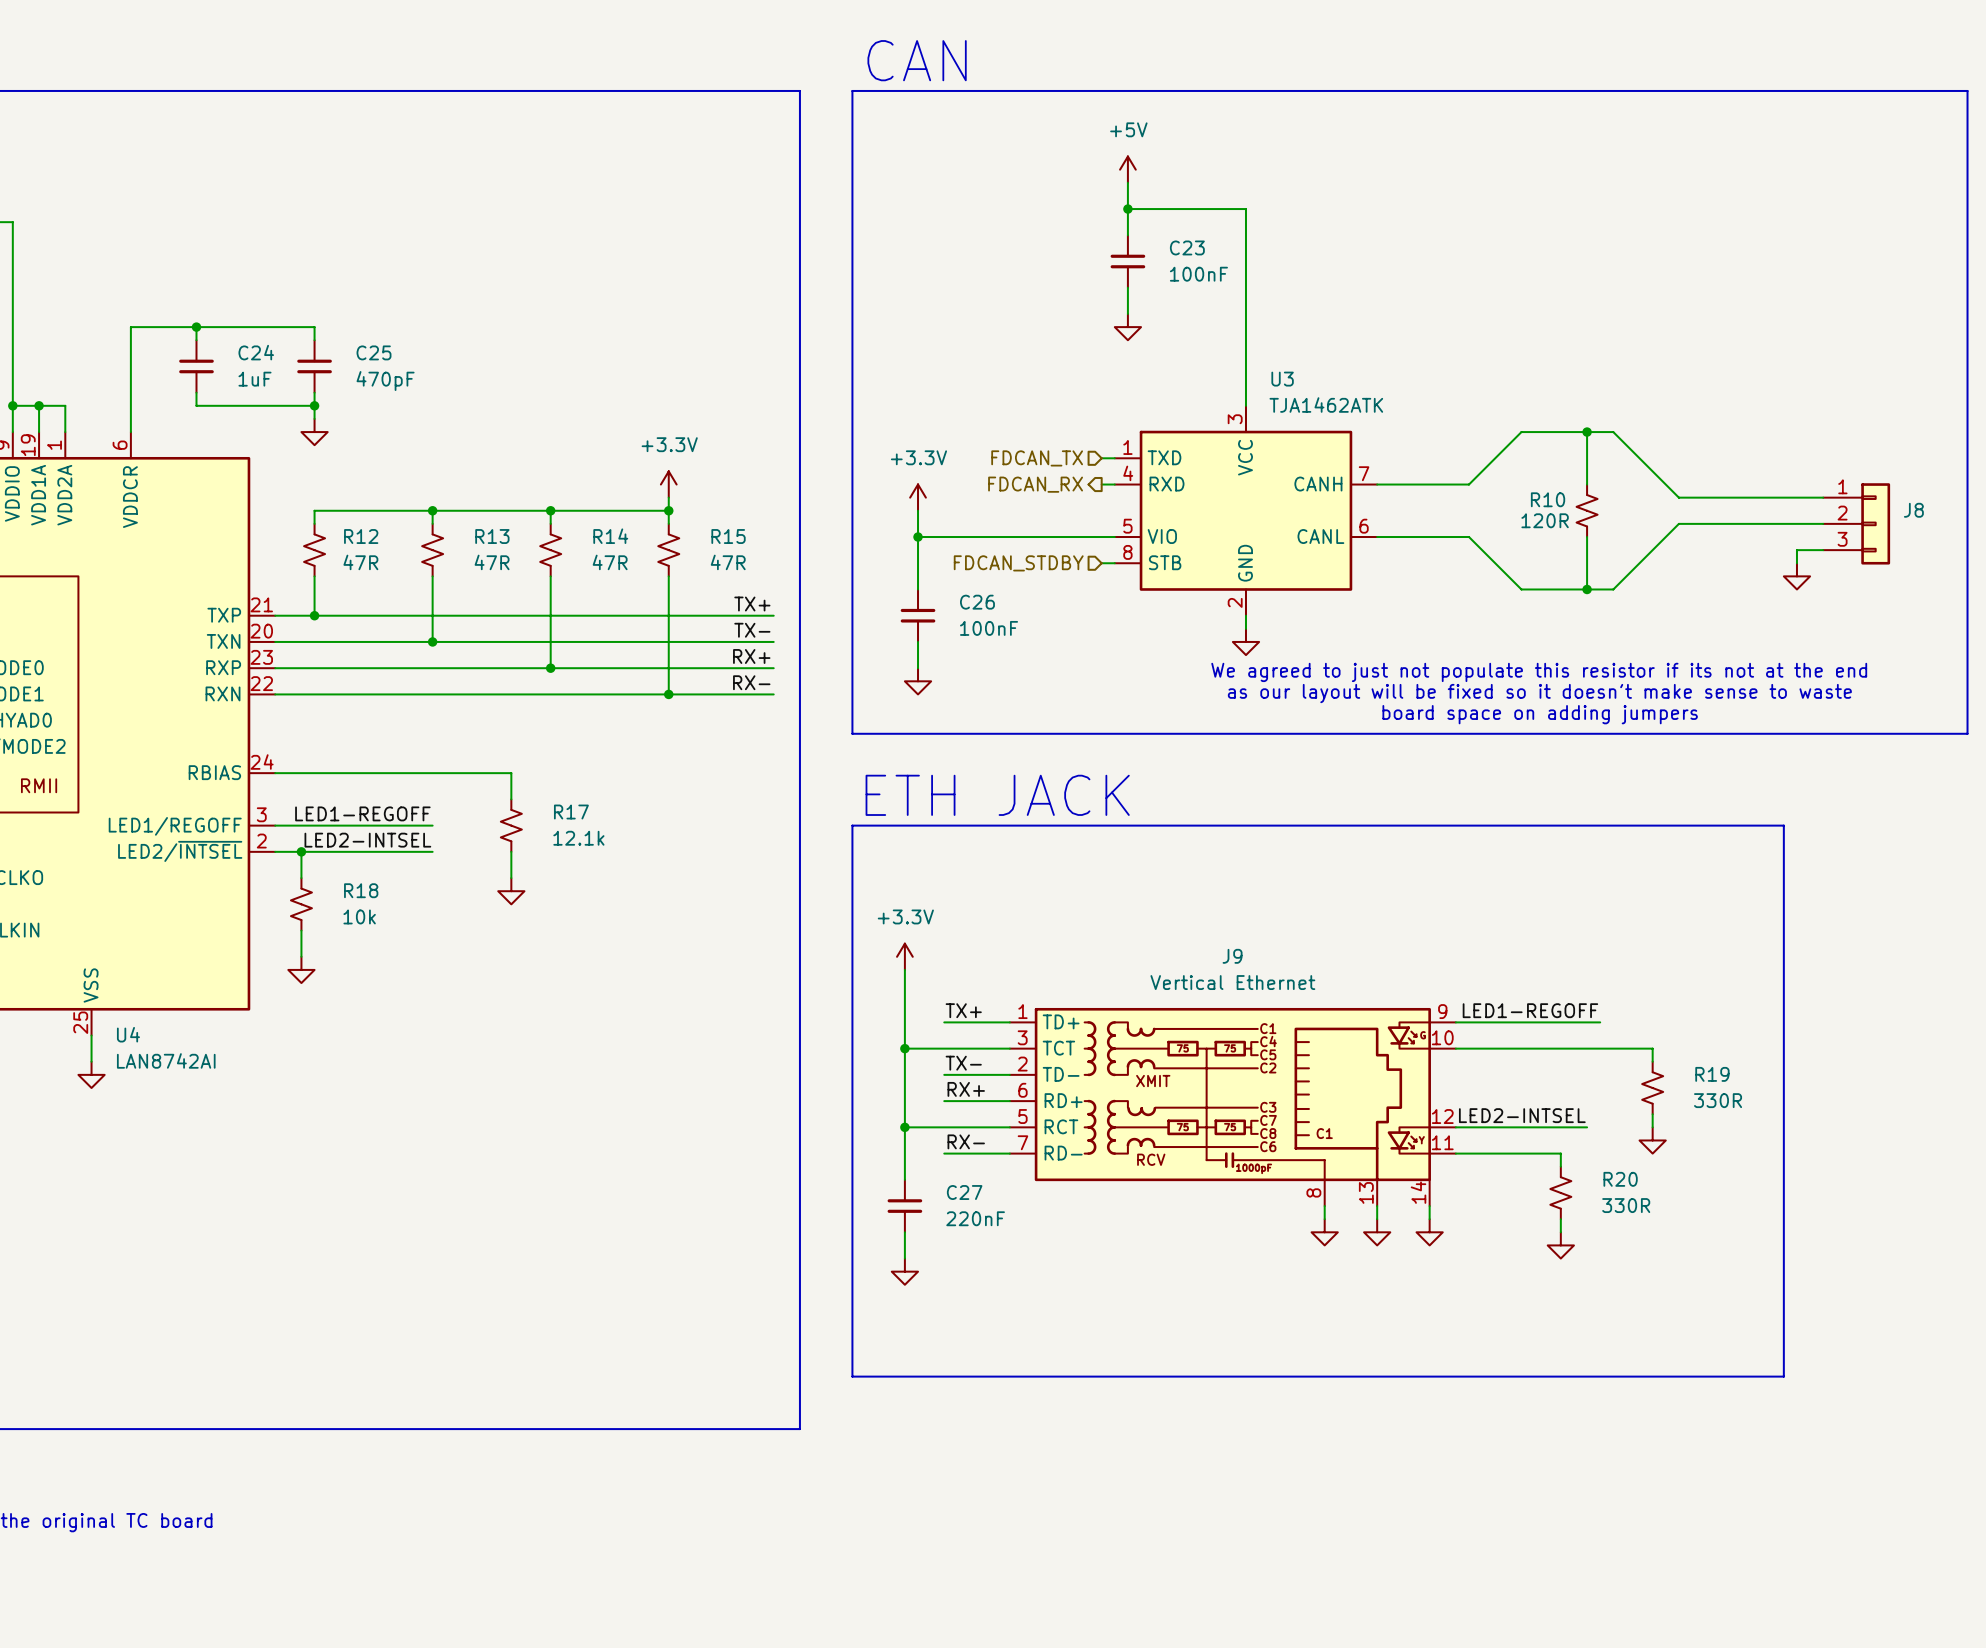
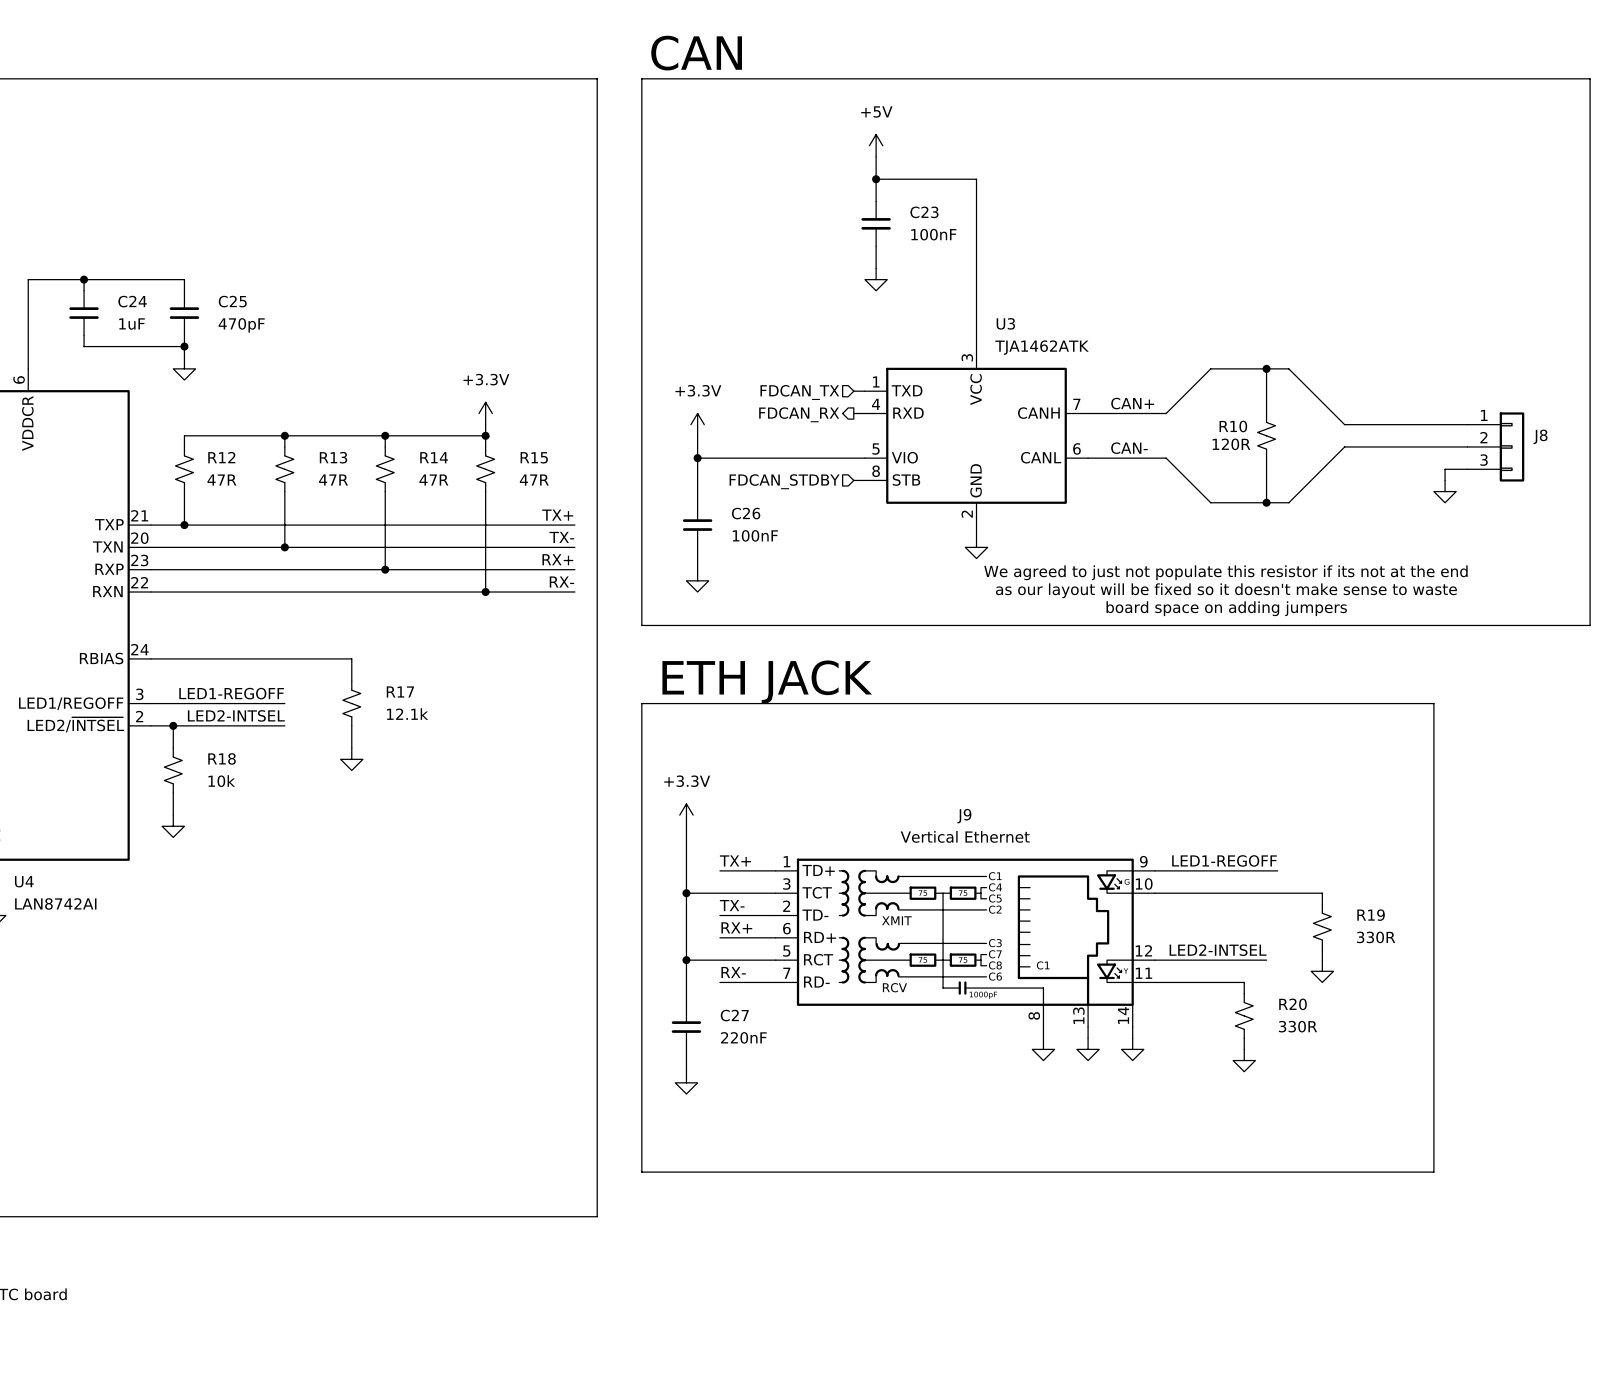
label: none -> CAN+ (1132, 403)
label: none -> CAN- (1129, 448)

